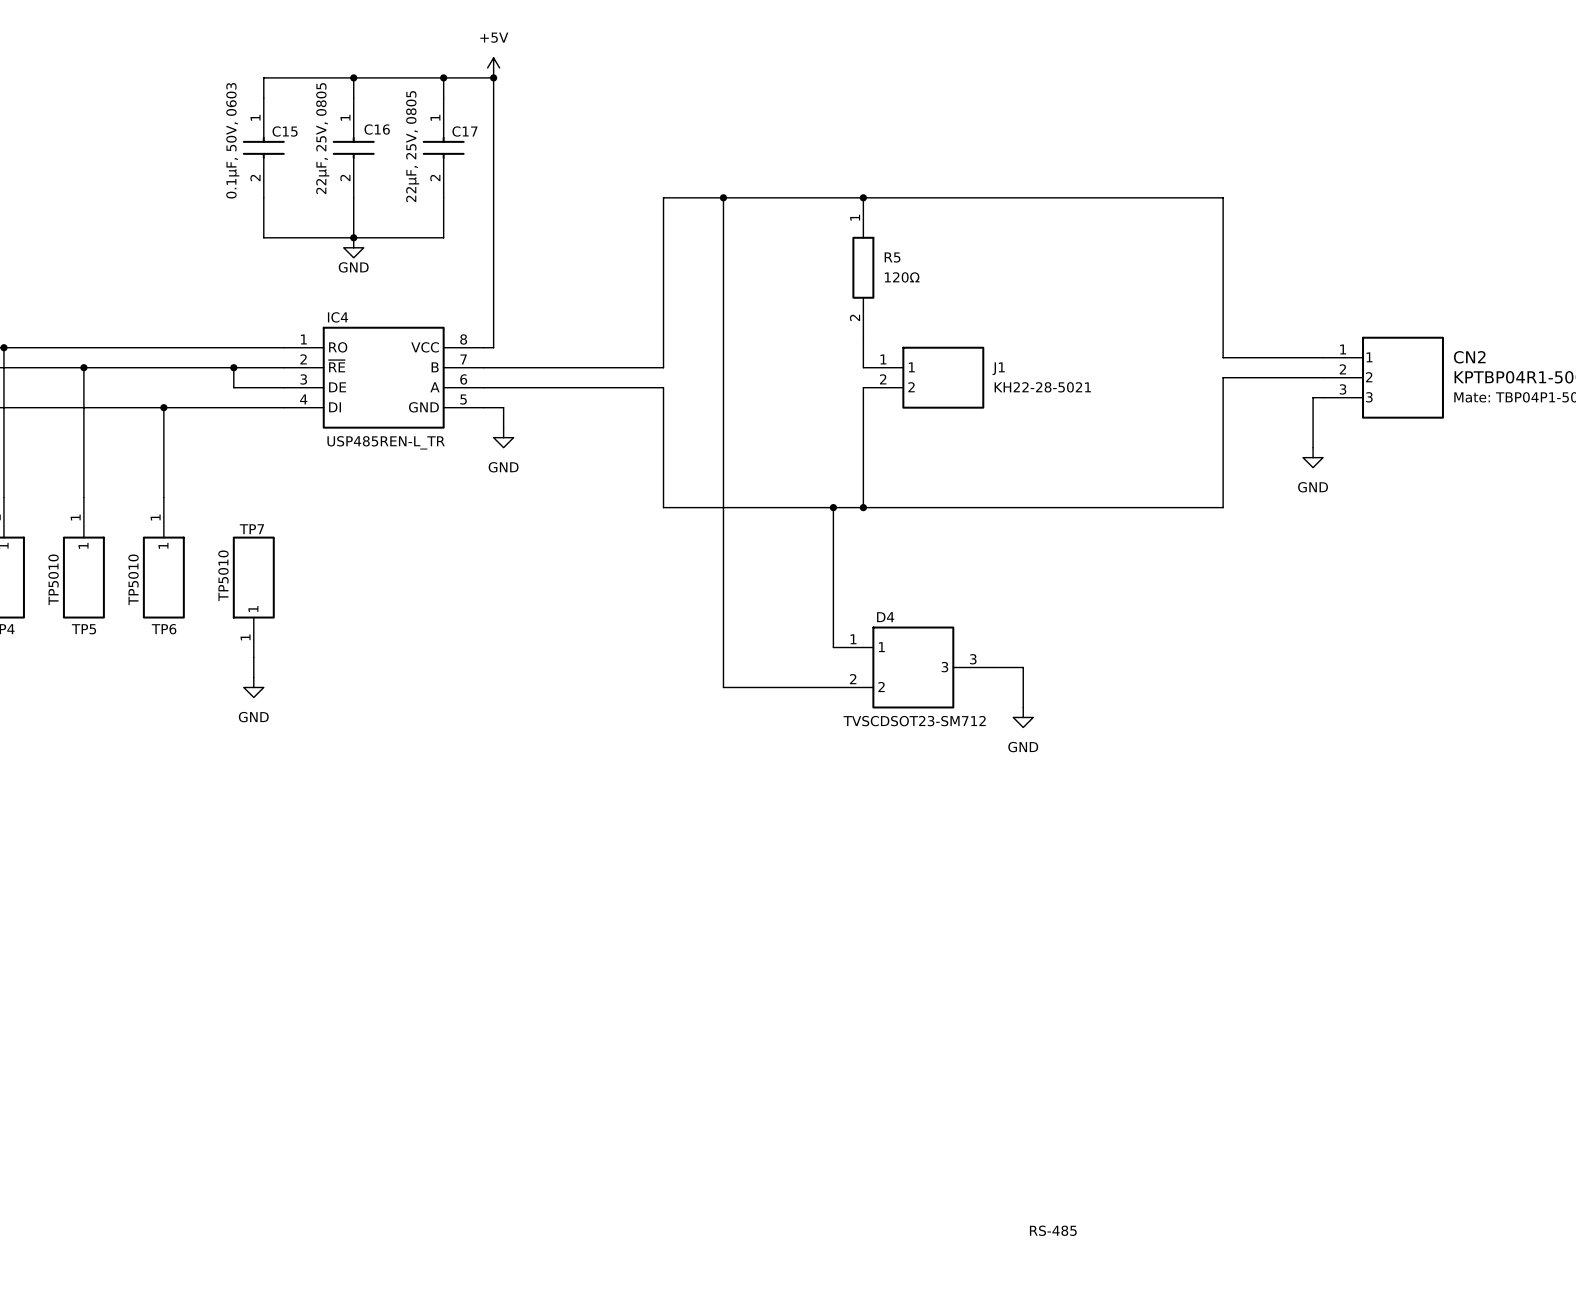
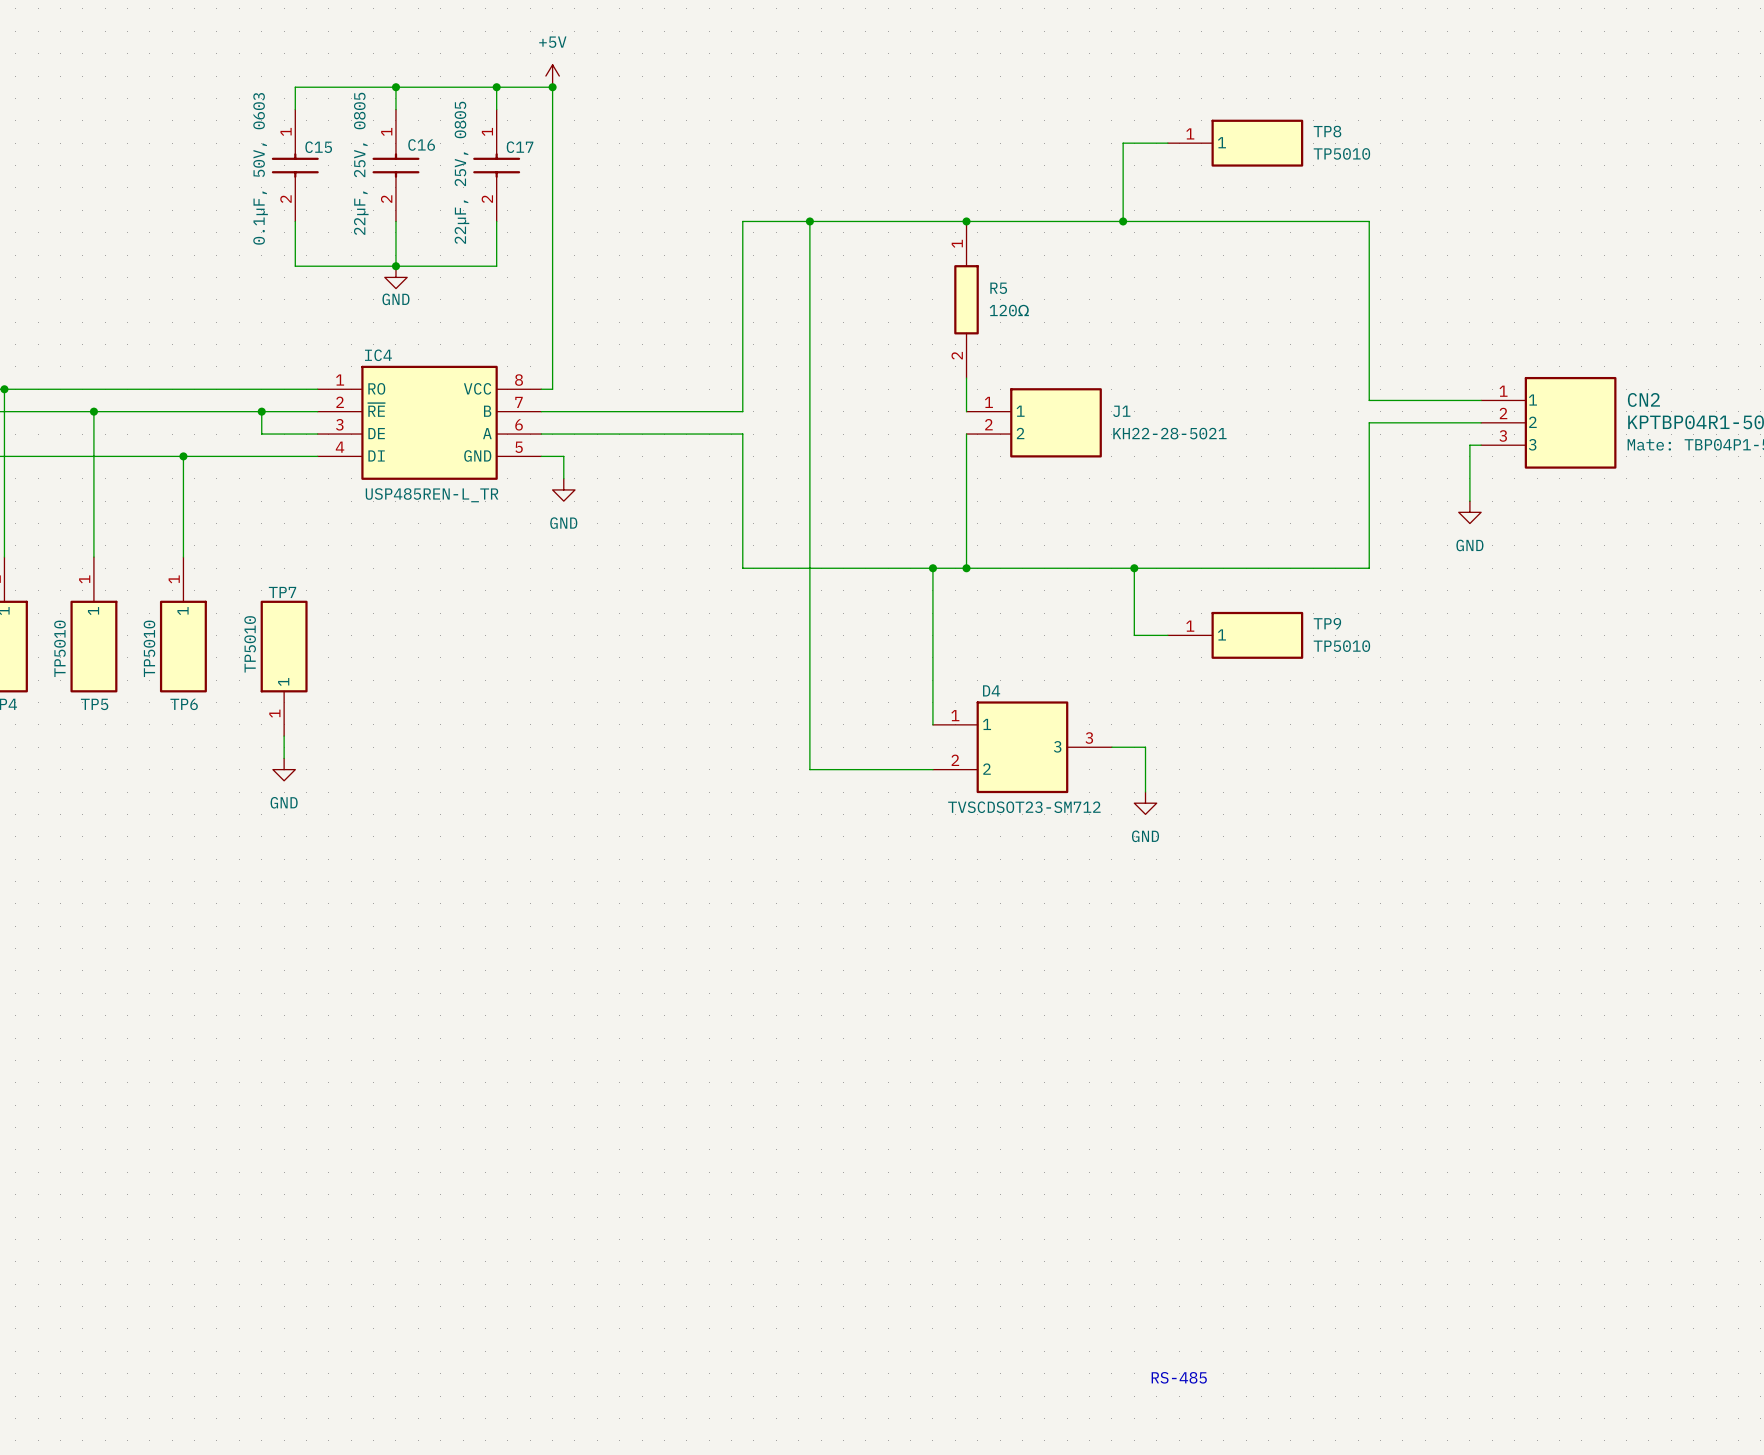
wire: none -> (1167, 143) (1123, 143) (1123, 221)
TP8: none -> TP5010 (1235, 143)
junction: none -> (1123, 221)
wire: none -> (1134, 568) (1134, 635) (1167, 635)
junction: none -> (1134, 568)
TP9: none -> TP5010 (1235, 635)

